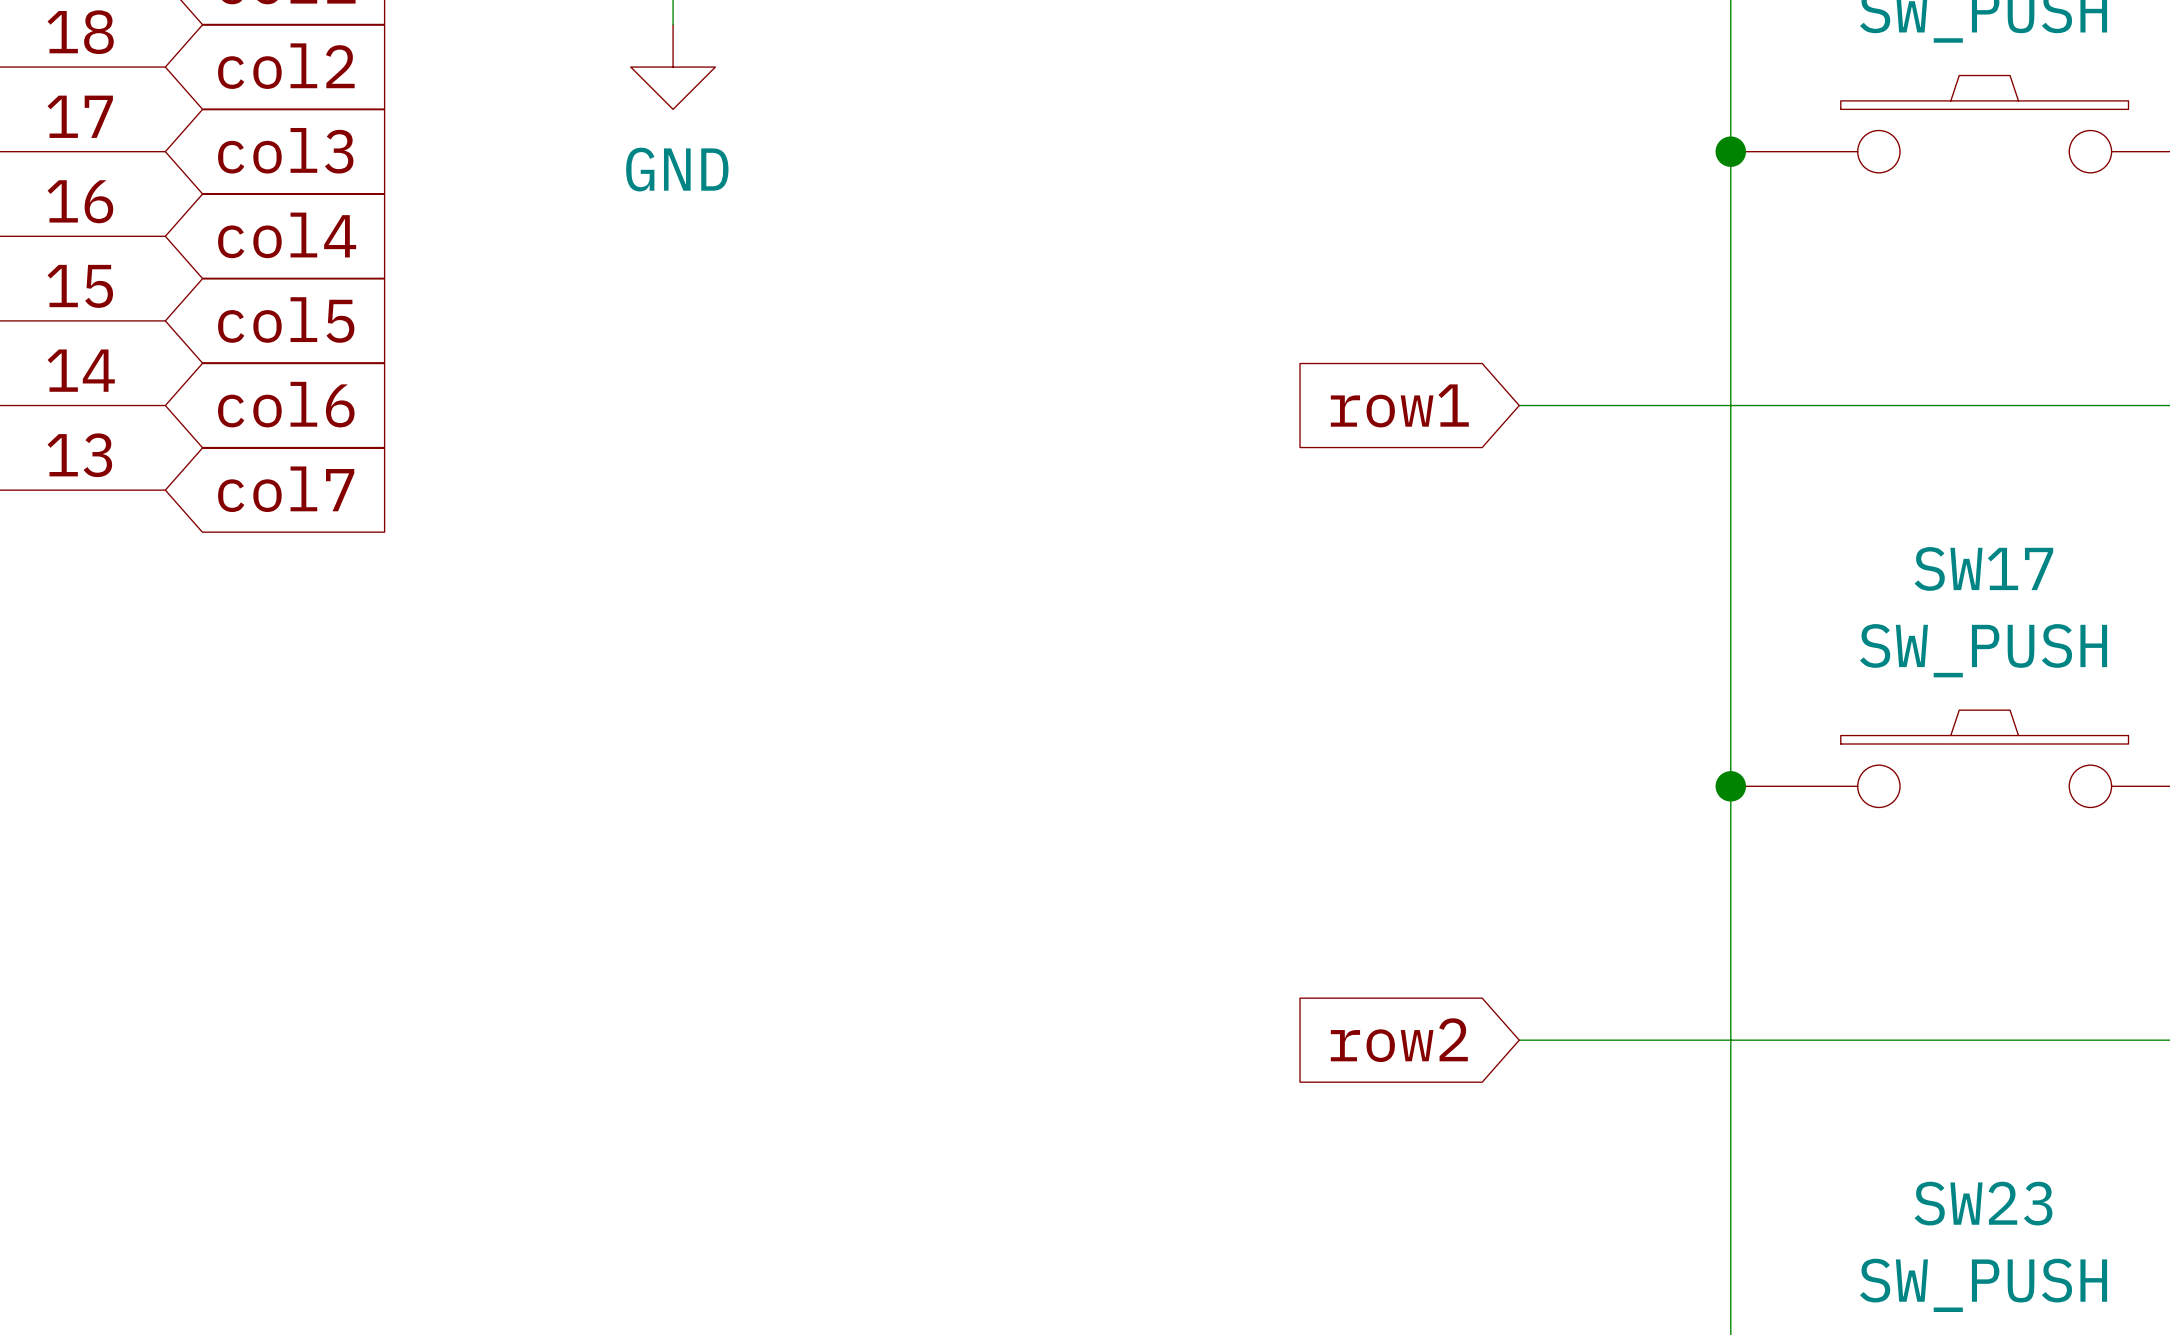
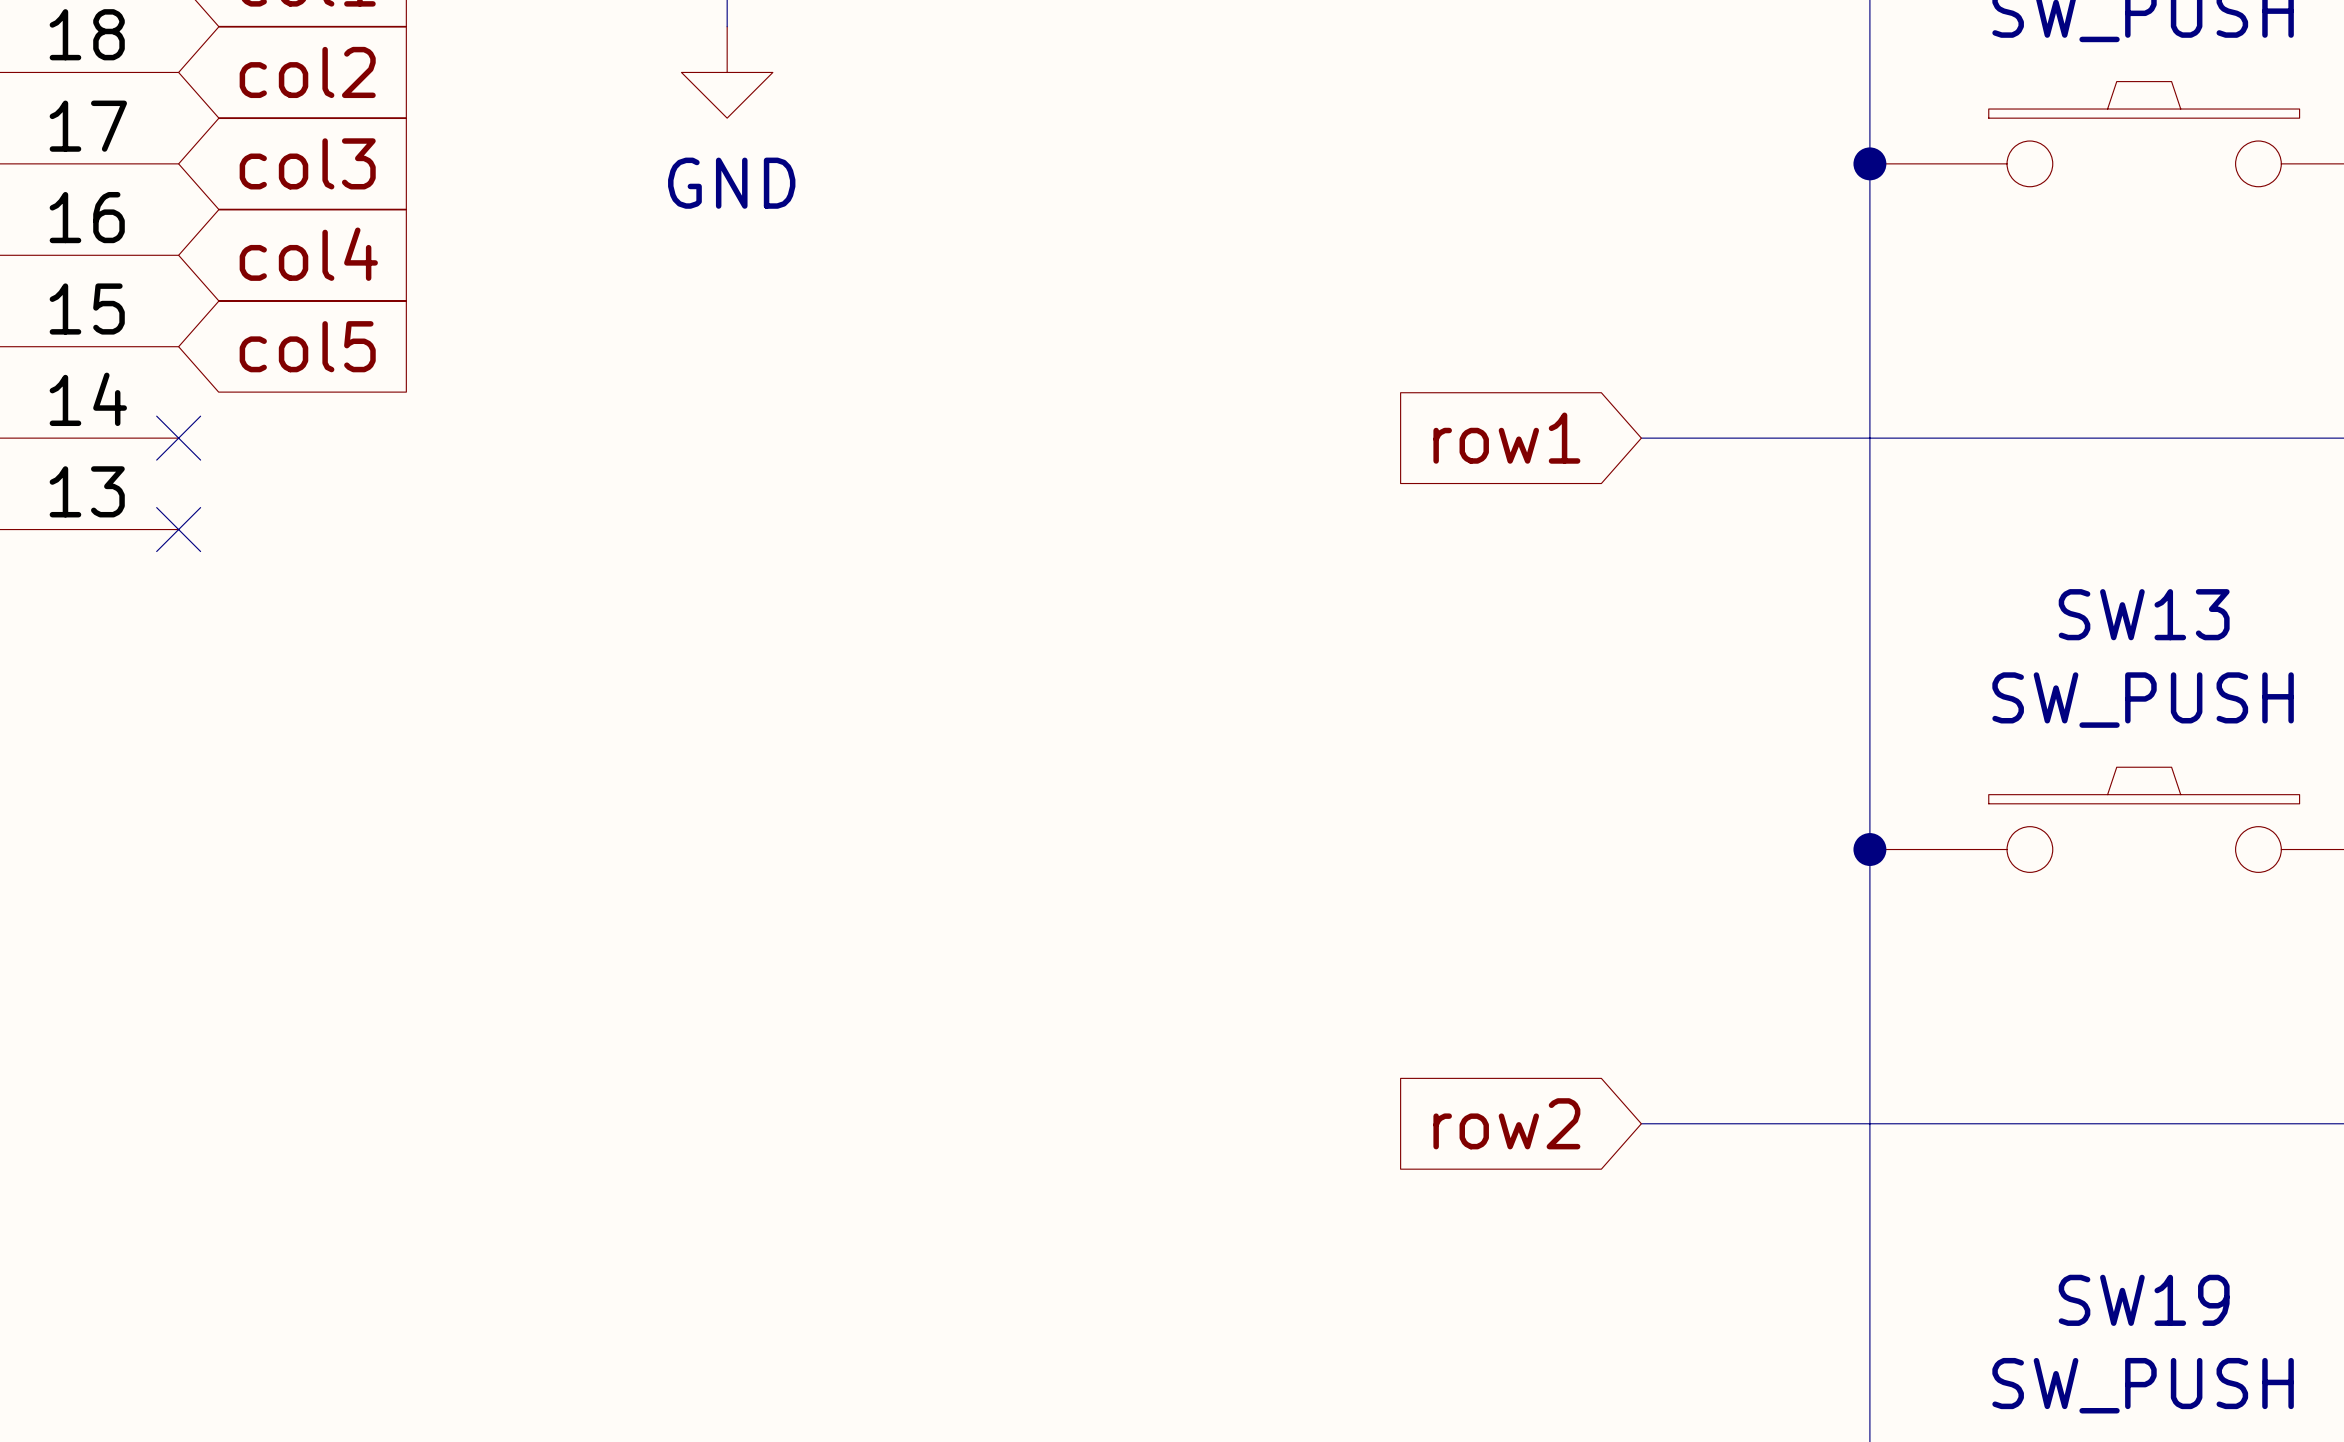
global label: col6 (286, 404) -> none
no-connect mark: none -> (178, 438)
global label: col7 (286, 489) -> none
no-connect mark: none -> (178, 529)
SW17 name: SW17 (1983, 568) -> SW13 (2144, 614)
SW23 name: SW23 (1983, 1203) -> SW19 (2144, 1300)

